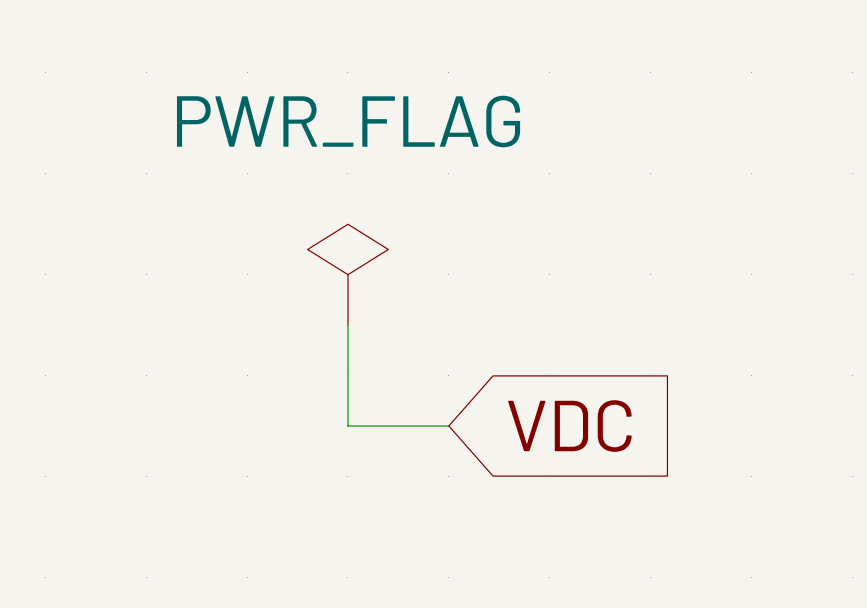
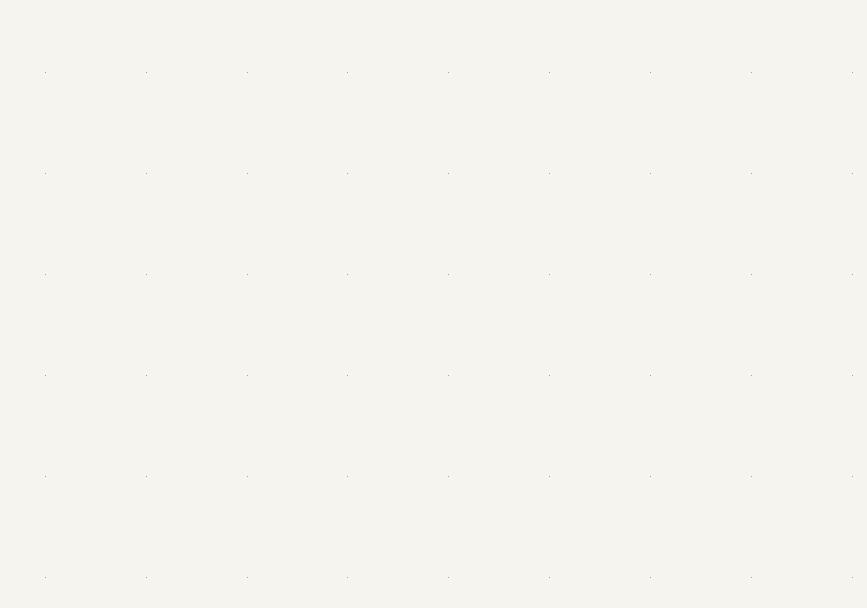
power symbol: PWR_FLAG (347, 274) -> none
wire: (347, 325) (347, 425) (448, 425) -> none
global label: VDC (569, 426) -> none

